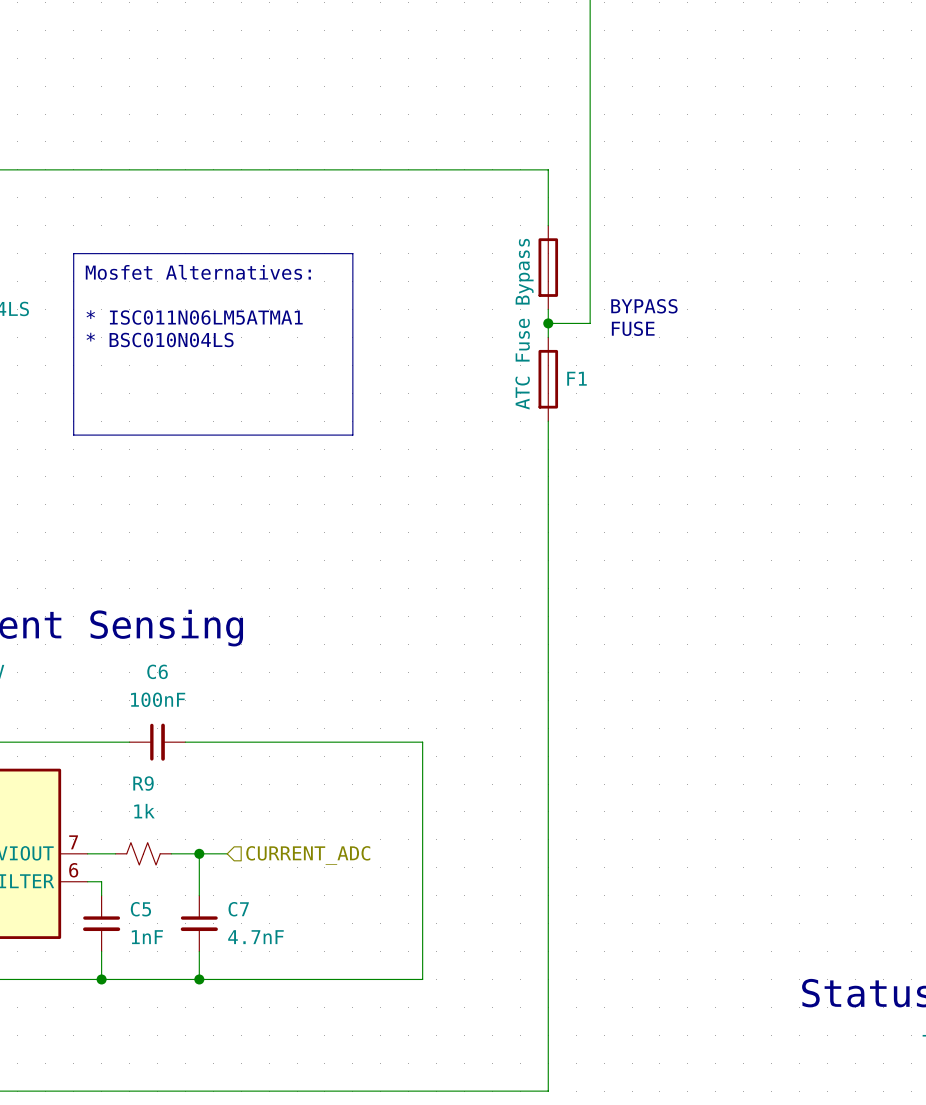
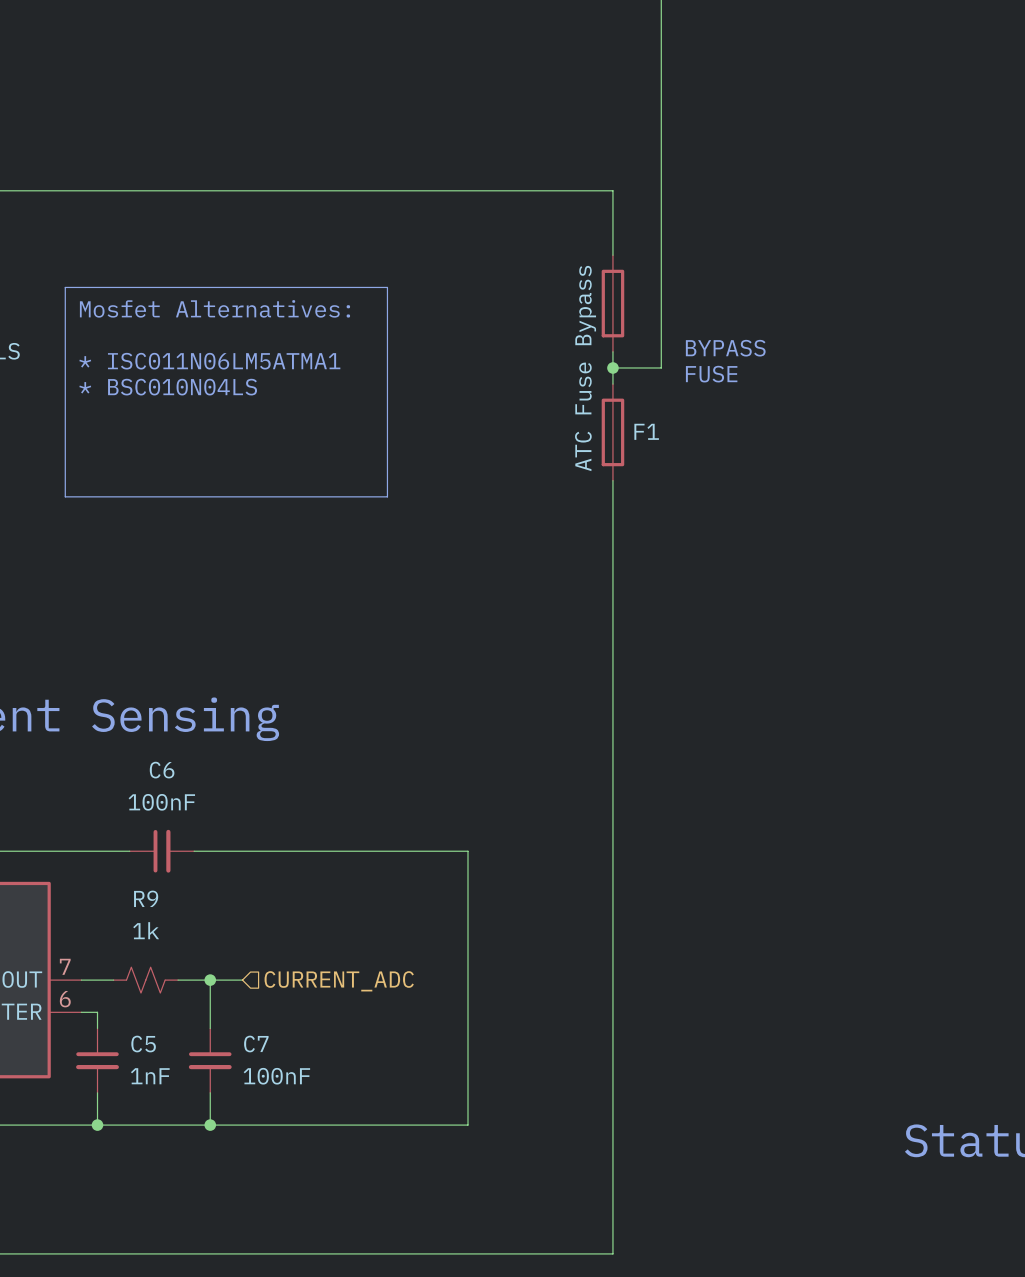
C7 value: 4.7nF (255, 937) -> 100nF (276, 1076)

